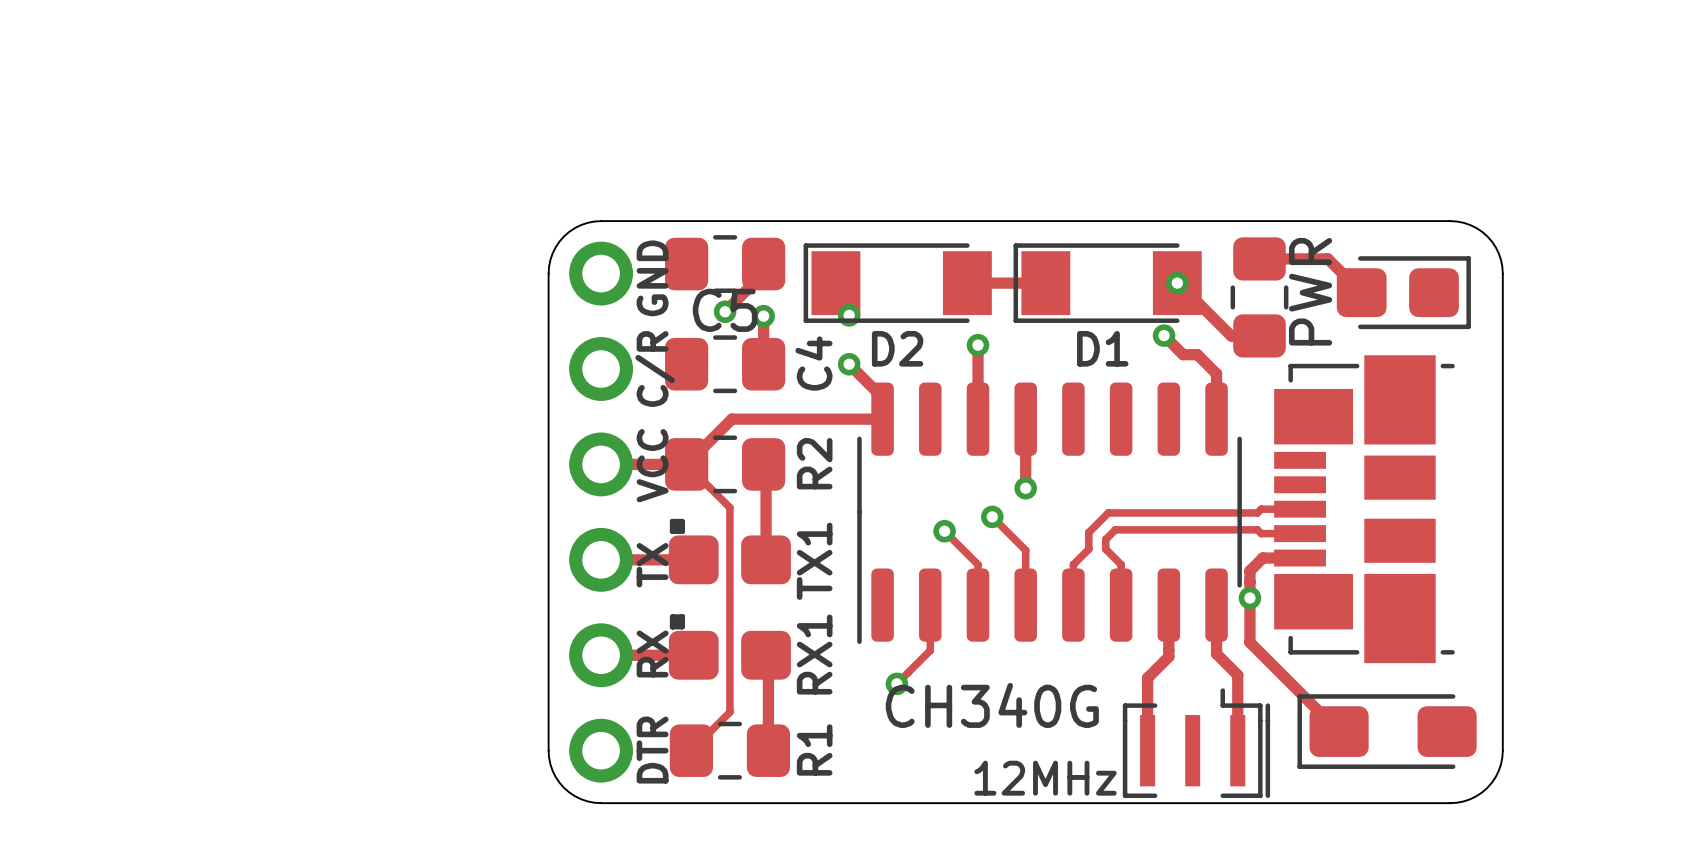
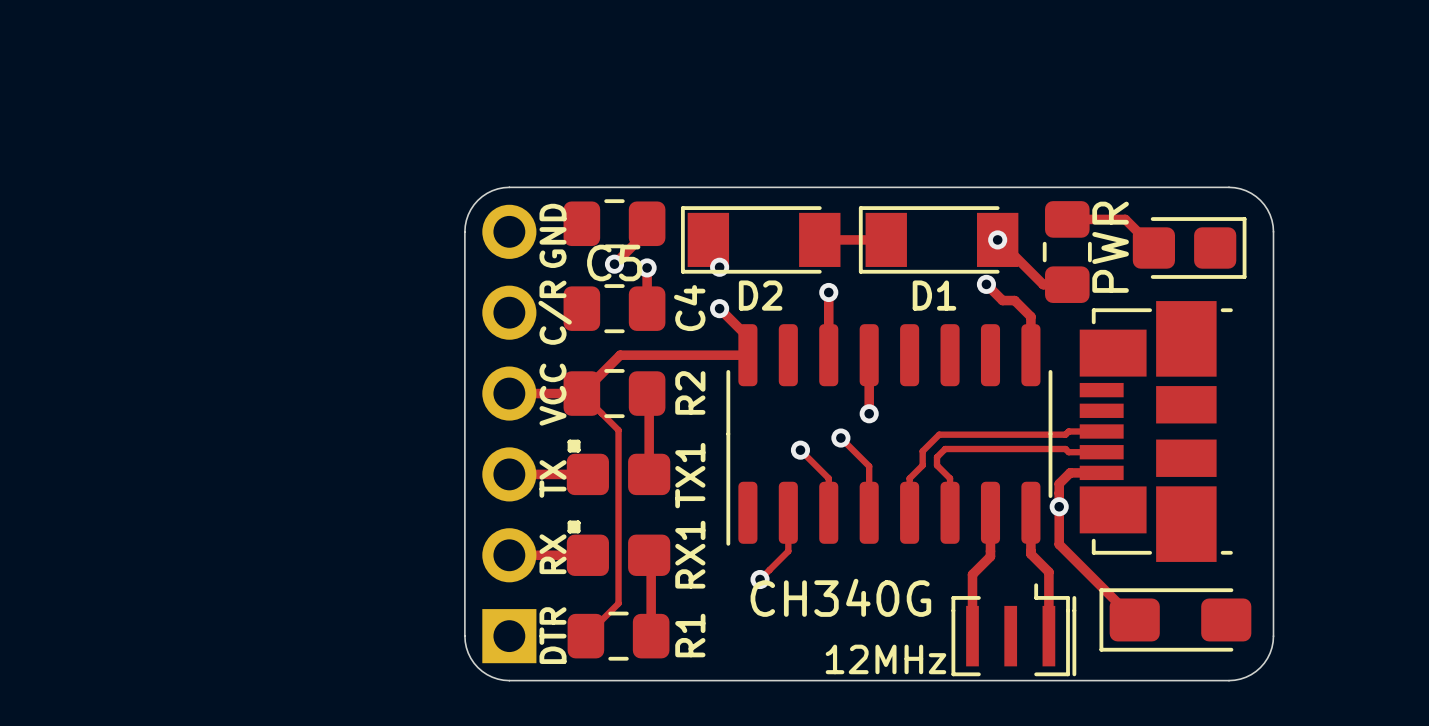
part footprint: [569, 241, 634, 783] -> [482, 204, 537, 664]

